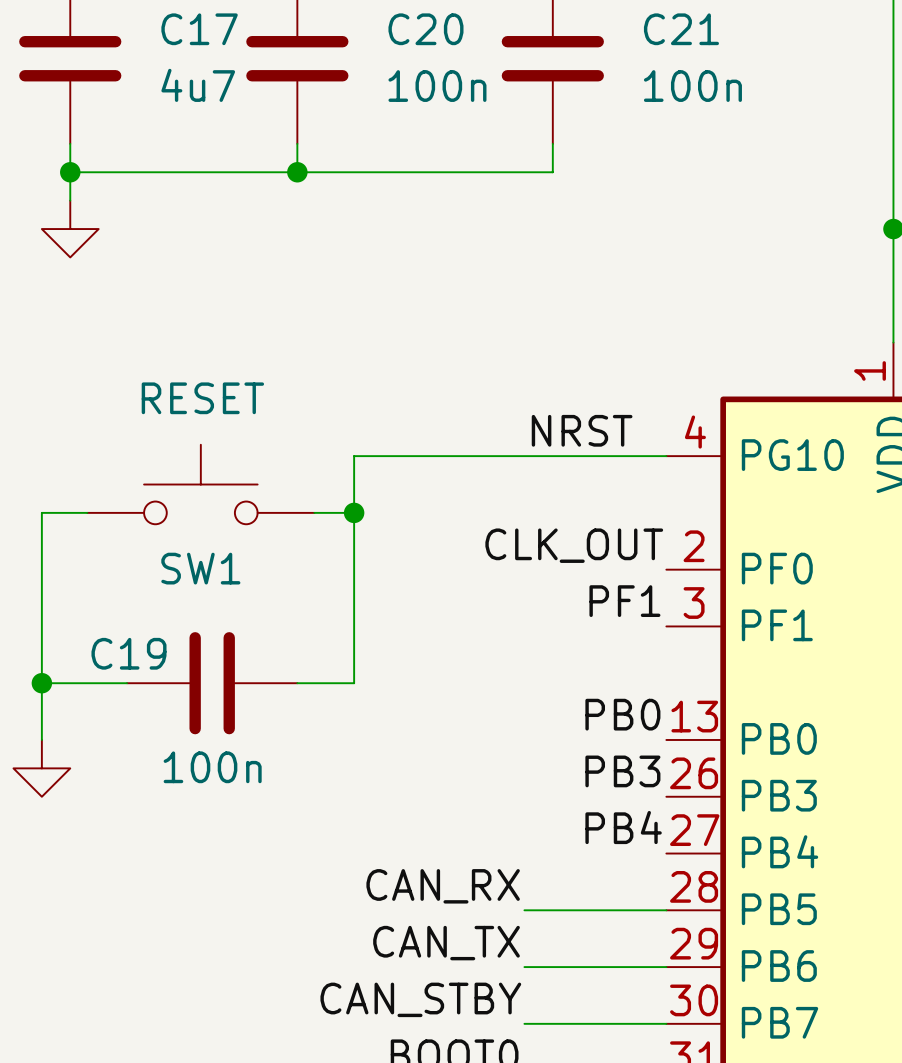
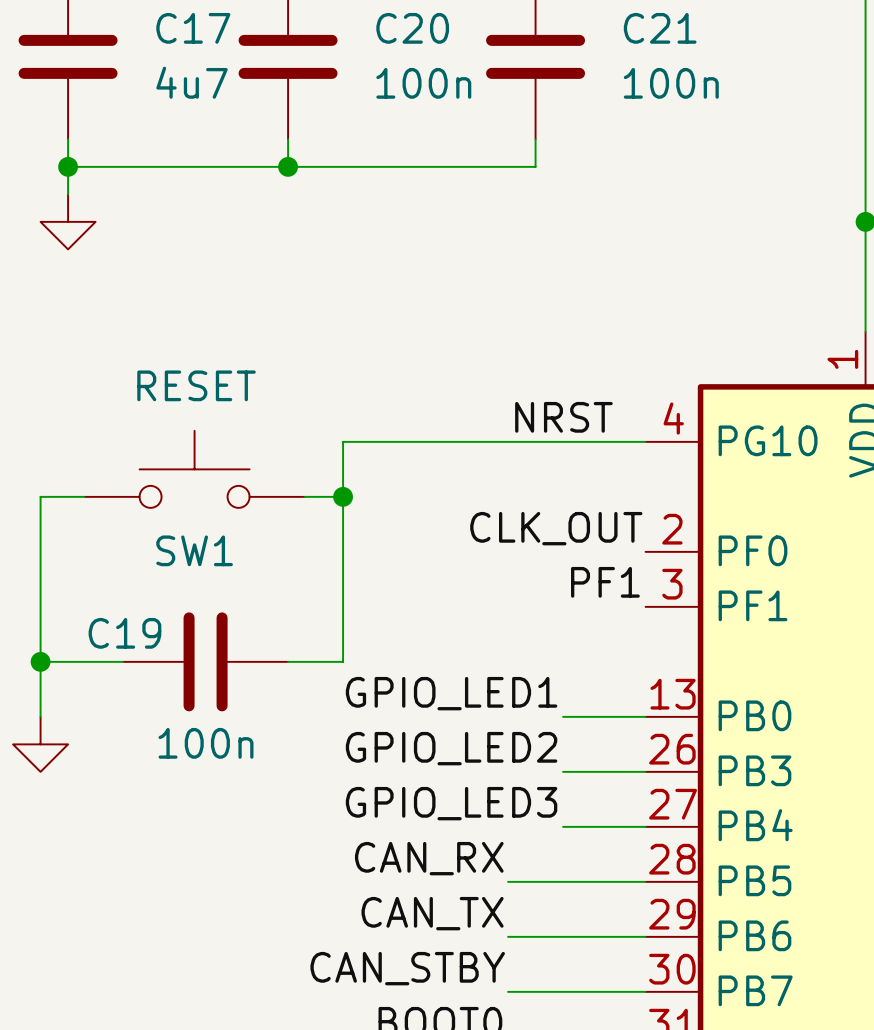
label: PB0 (622, 714) -> none
label: none -> GPIO_LED1 (451, 693)
wire: none -> (563, 716) (645, 716)
label: PB3 (622, 771) -> none
label: none -> GPIO_LED2 (451, 748)
wire: none -> (563, 771) (645, 771)
label: PB4 (623, 827) -> none
label: none -> GPIO_LED3 (451, 803)
wire: none -> (563, 826) (645, 826)

